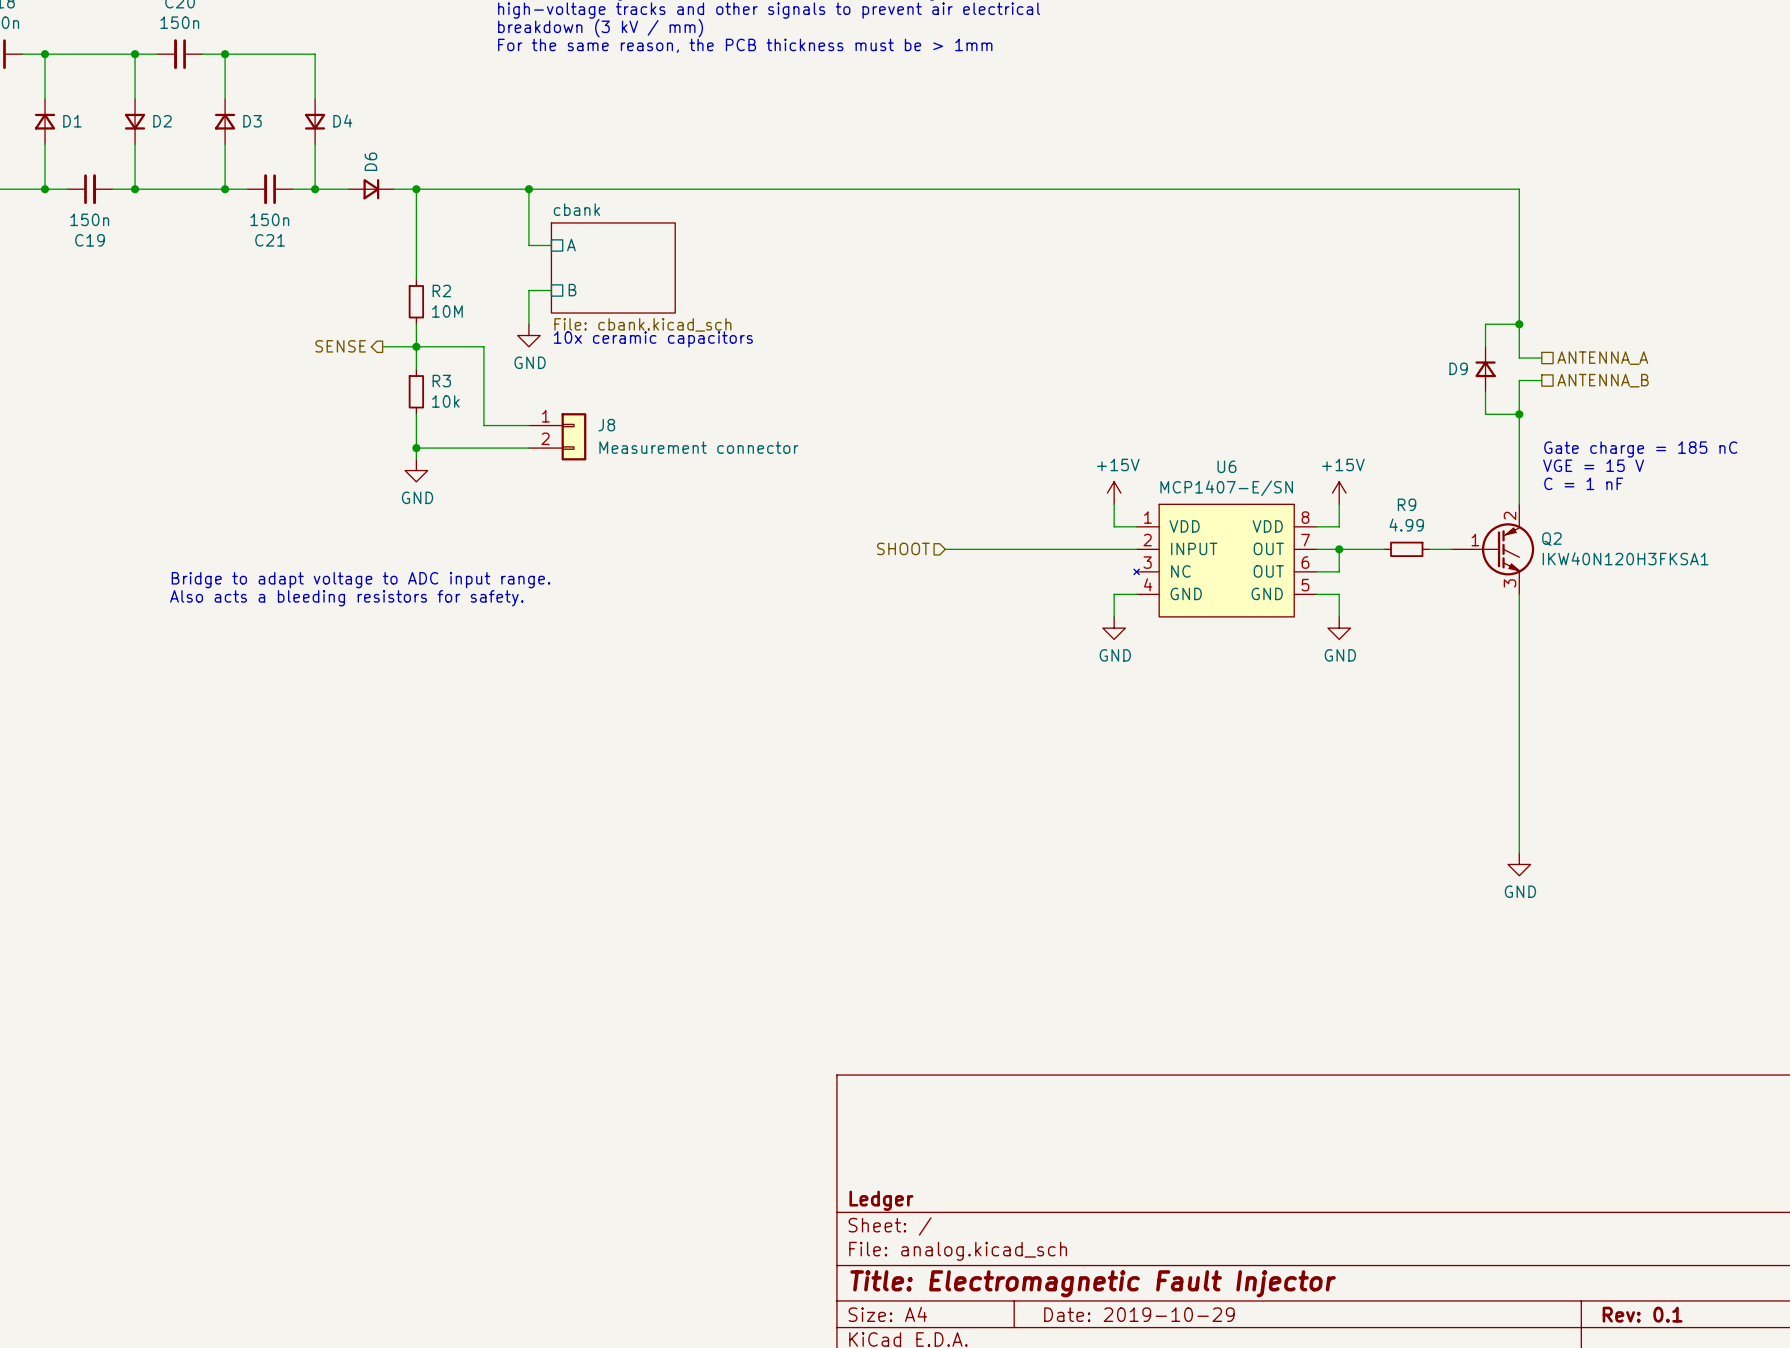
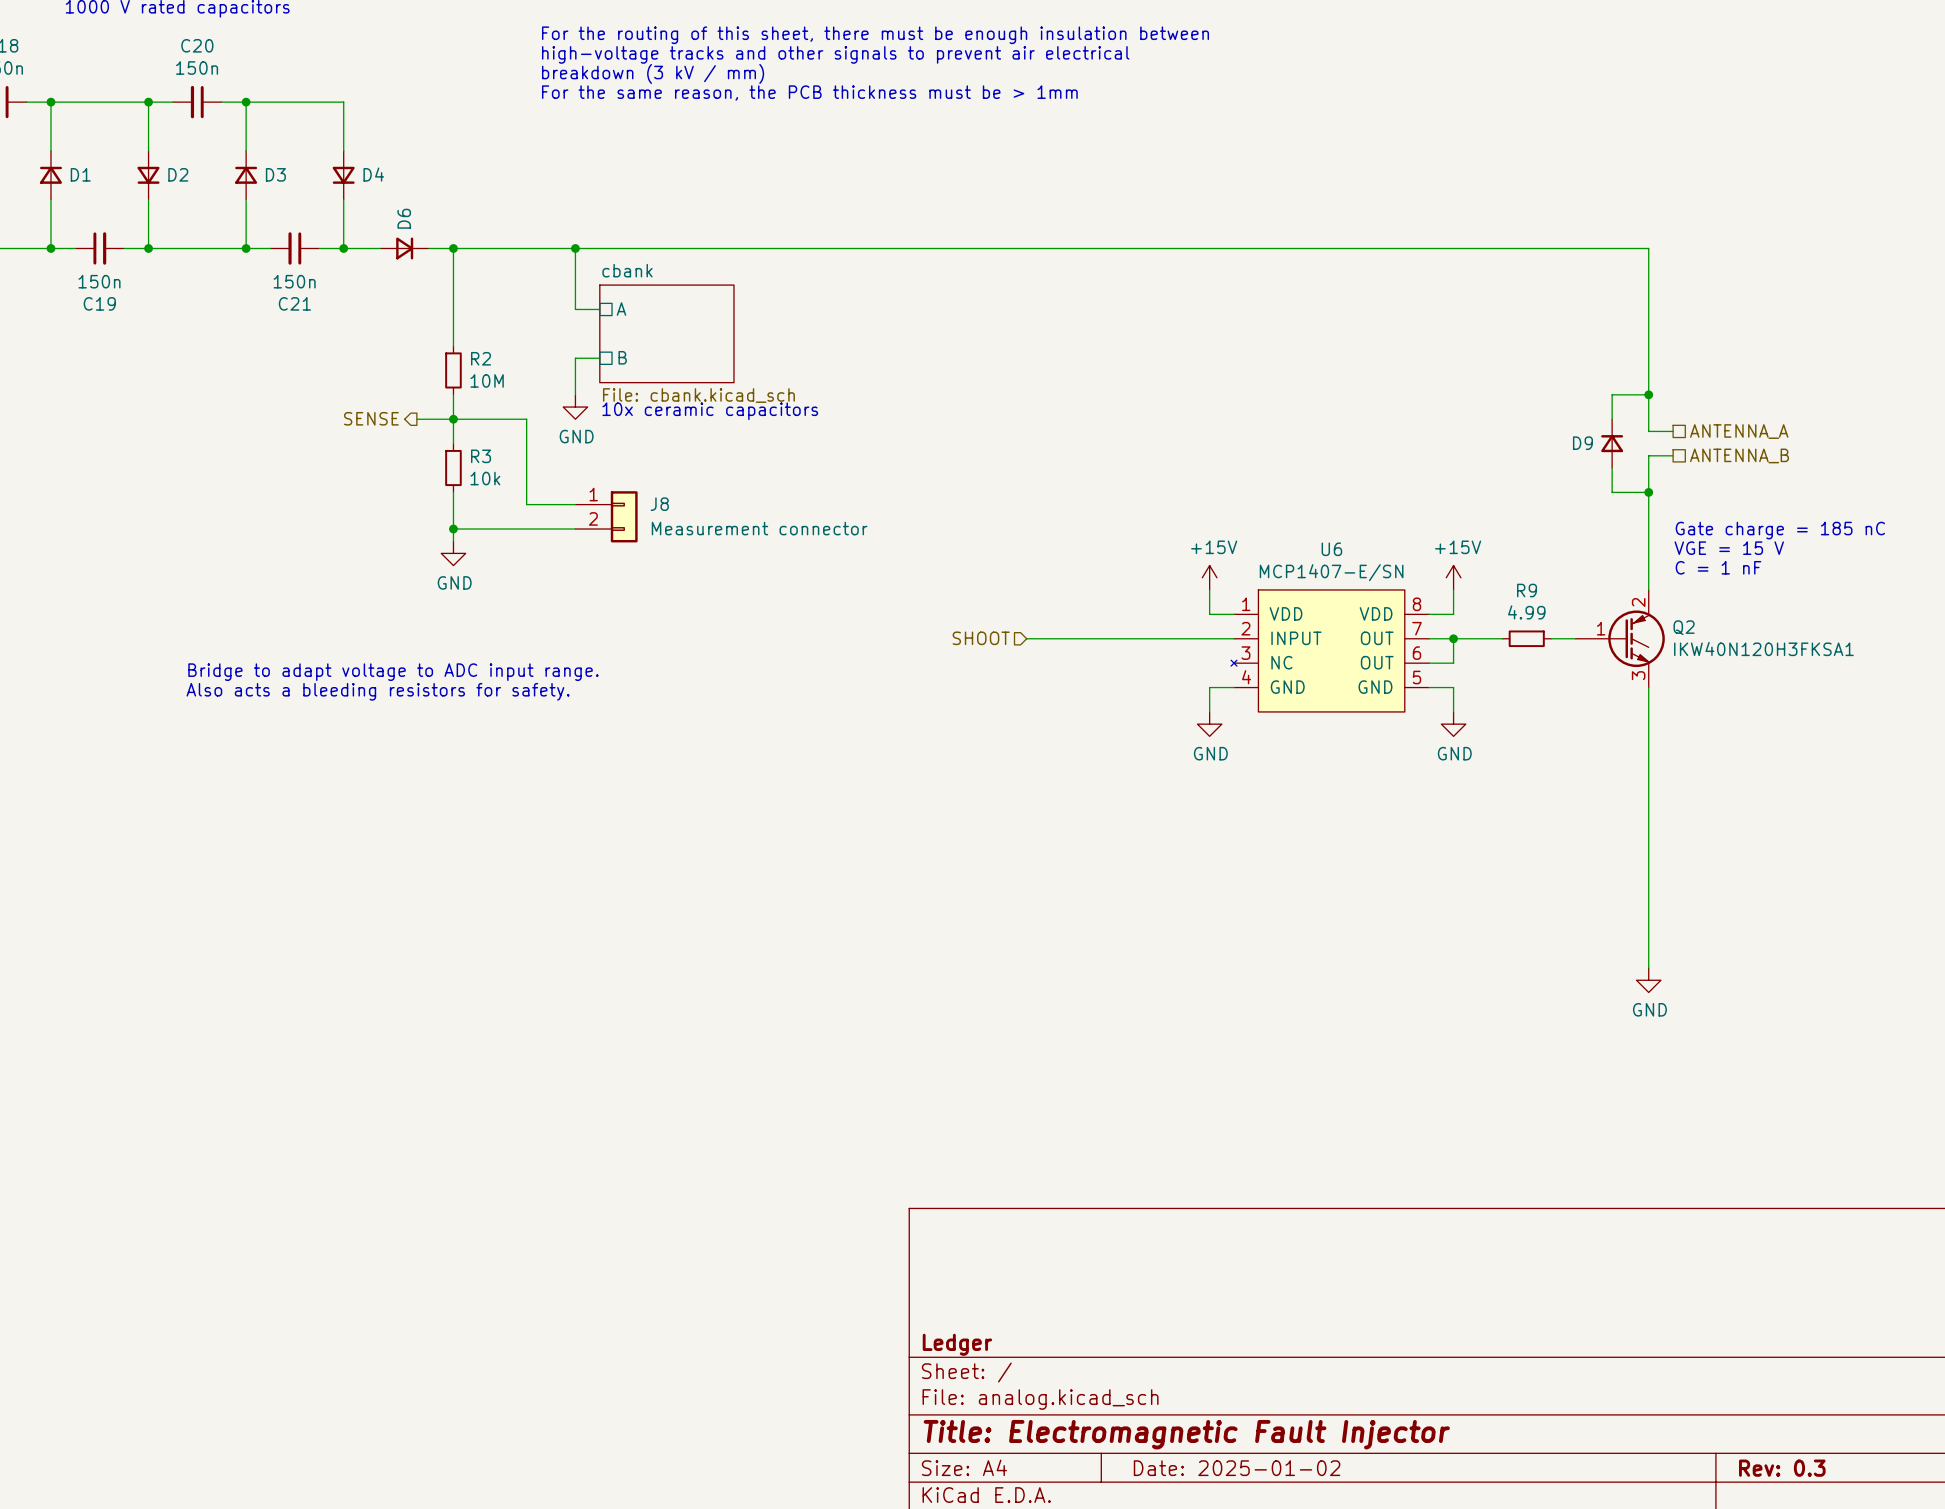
title block: Date: 2019-10-29 (1139, 1314) -> Date: 2025-01-02 (1237, 1468)
title block: Rev: 0.1 (1642, 1314) -> Rev: 0.3 (1782, 1468)

